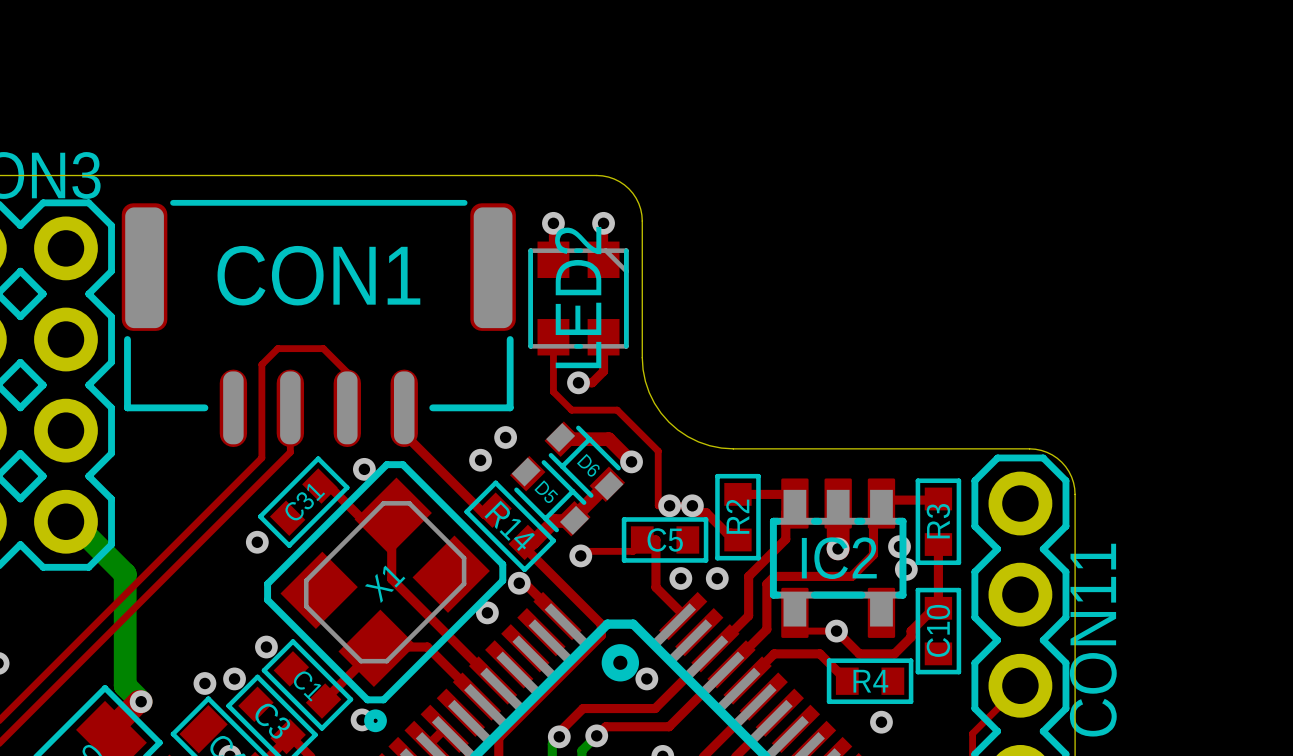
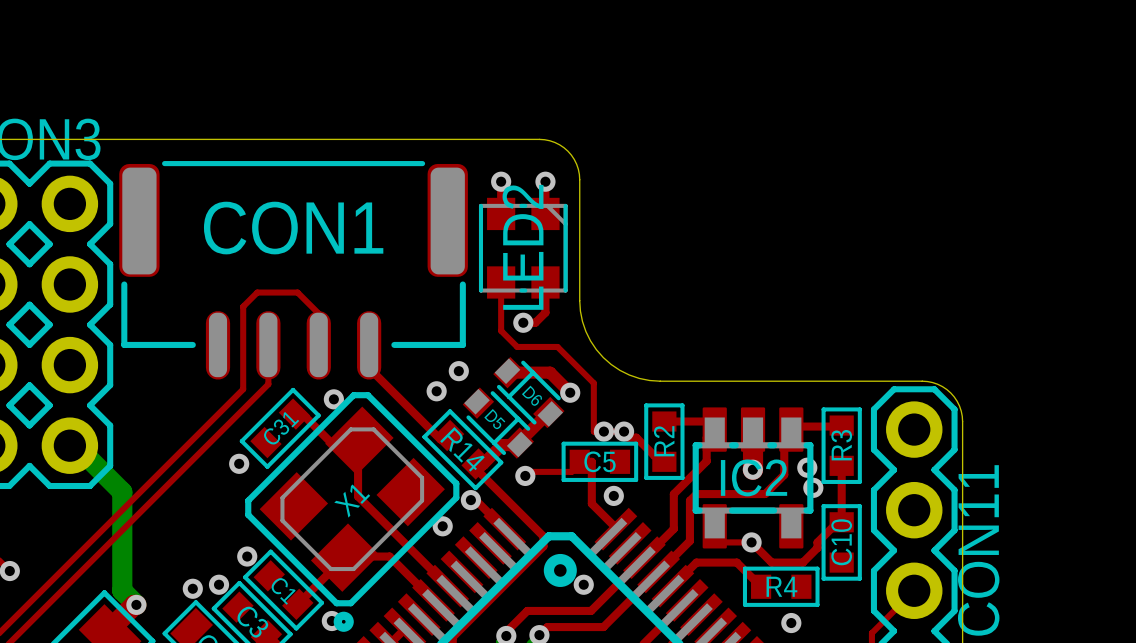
via: (717, 578) -> none

